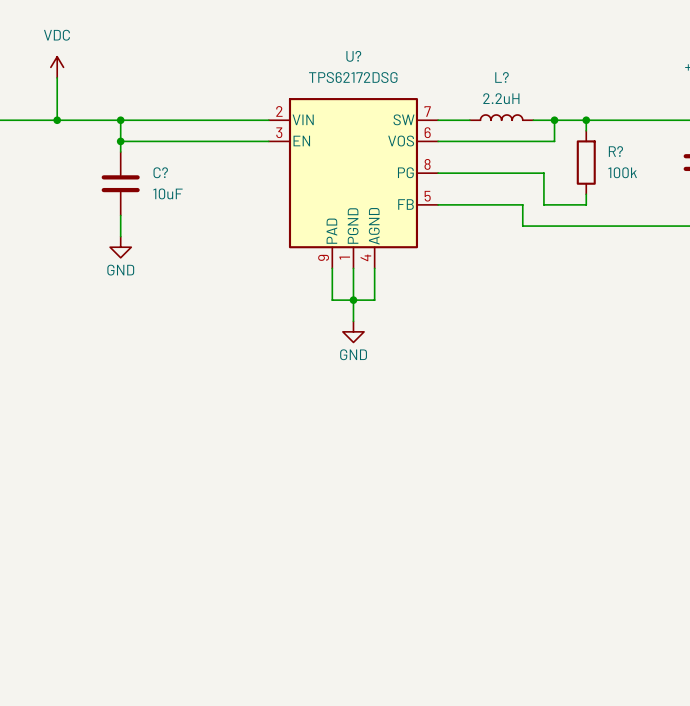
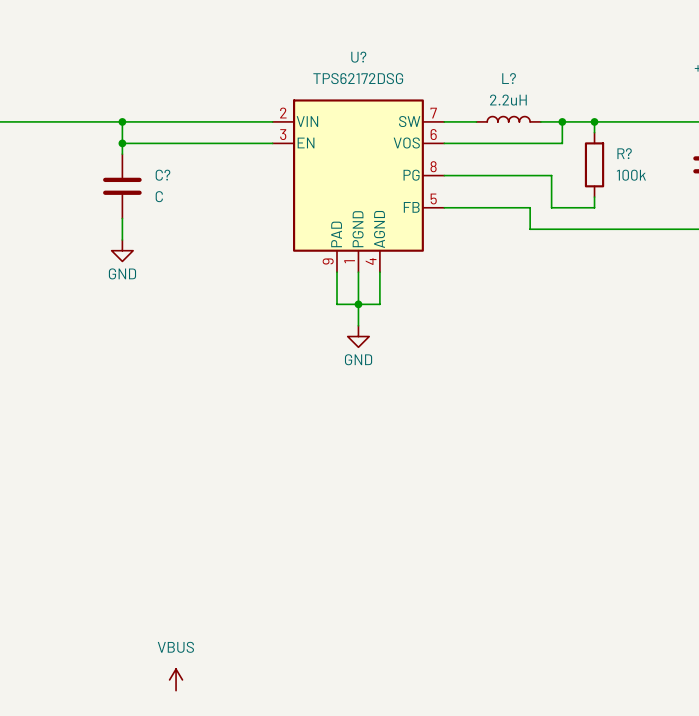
power symbol: VDC (57, 67) -> none
wire: (57, 77) (57, 120) -> none
junction: (57, 120) -> none
C? value: 10uF (167, 193) -> C (159, 196)
power symbol: none -> VBUS (176, 679)

